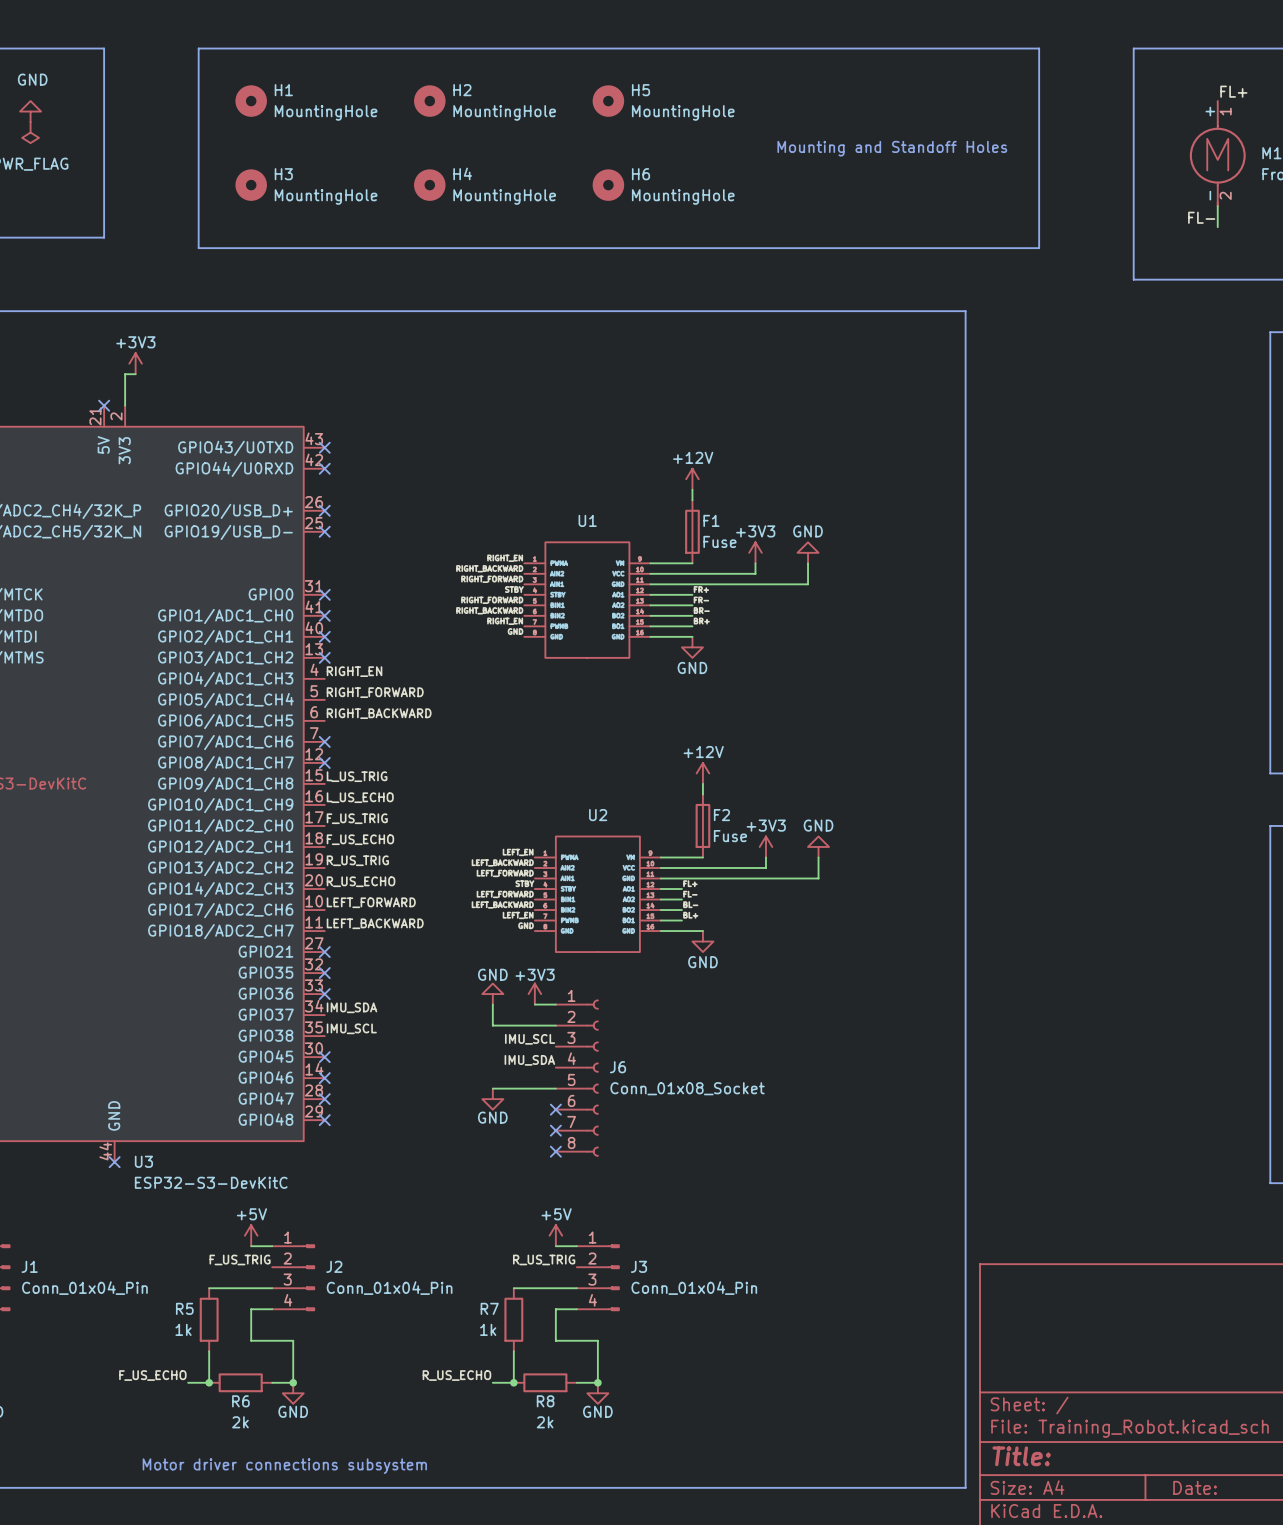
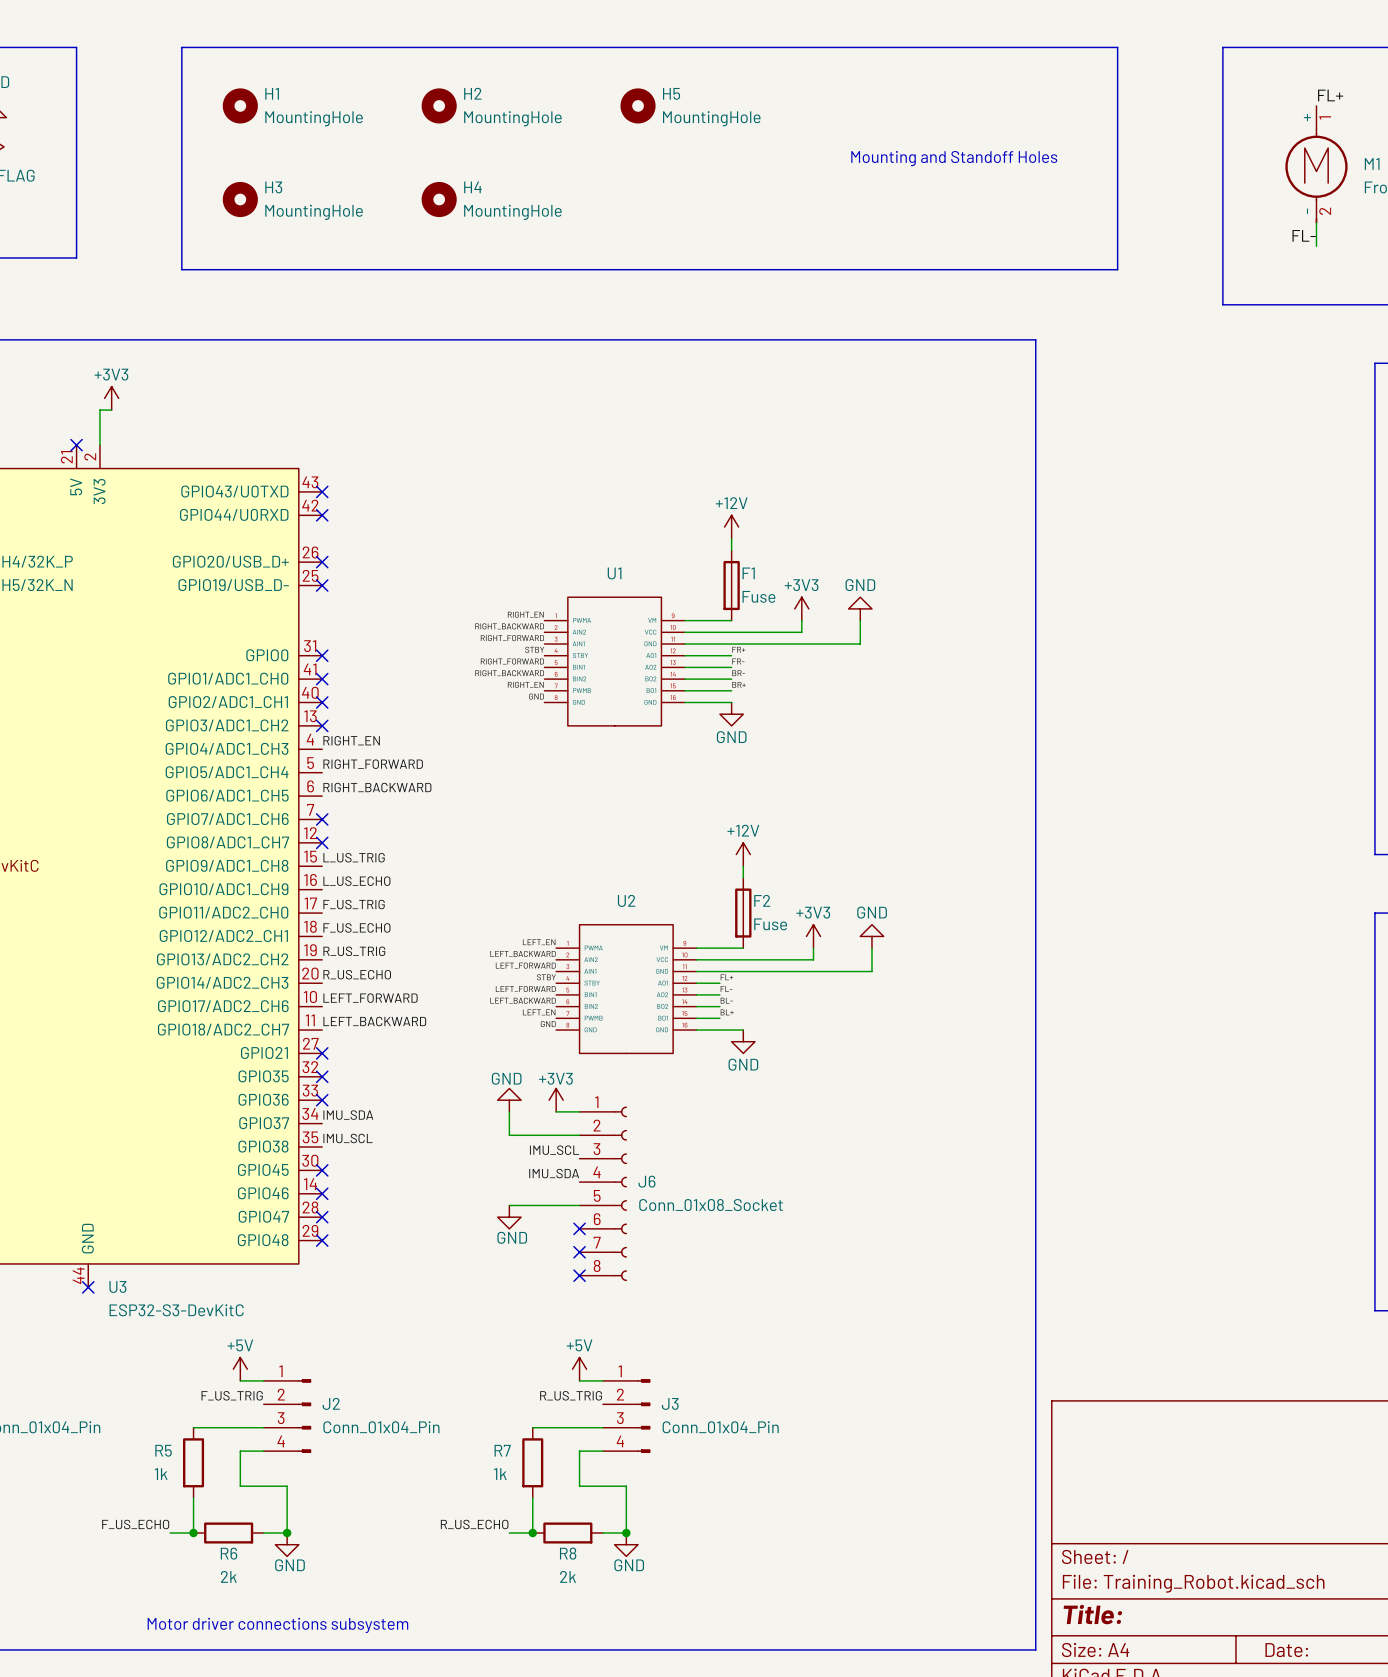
H6: MountingHole (608, 185) -> none

